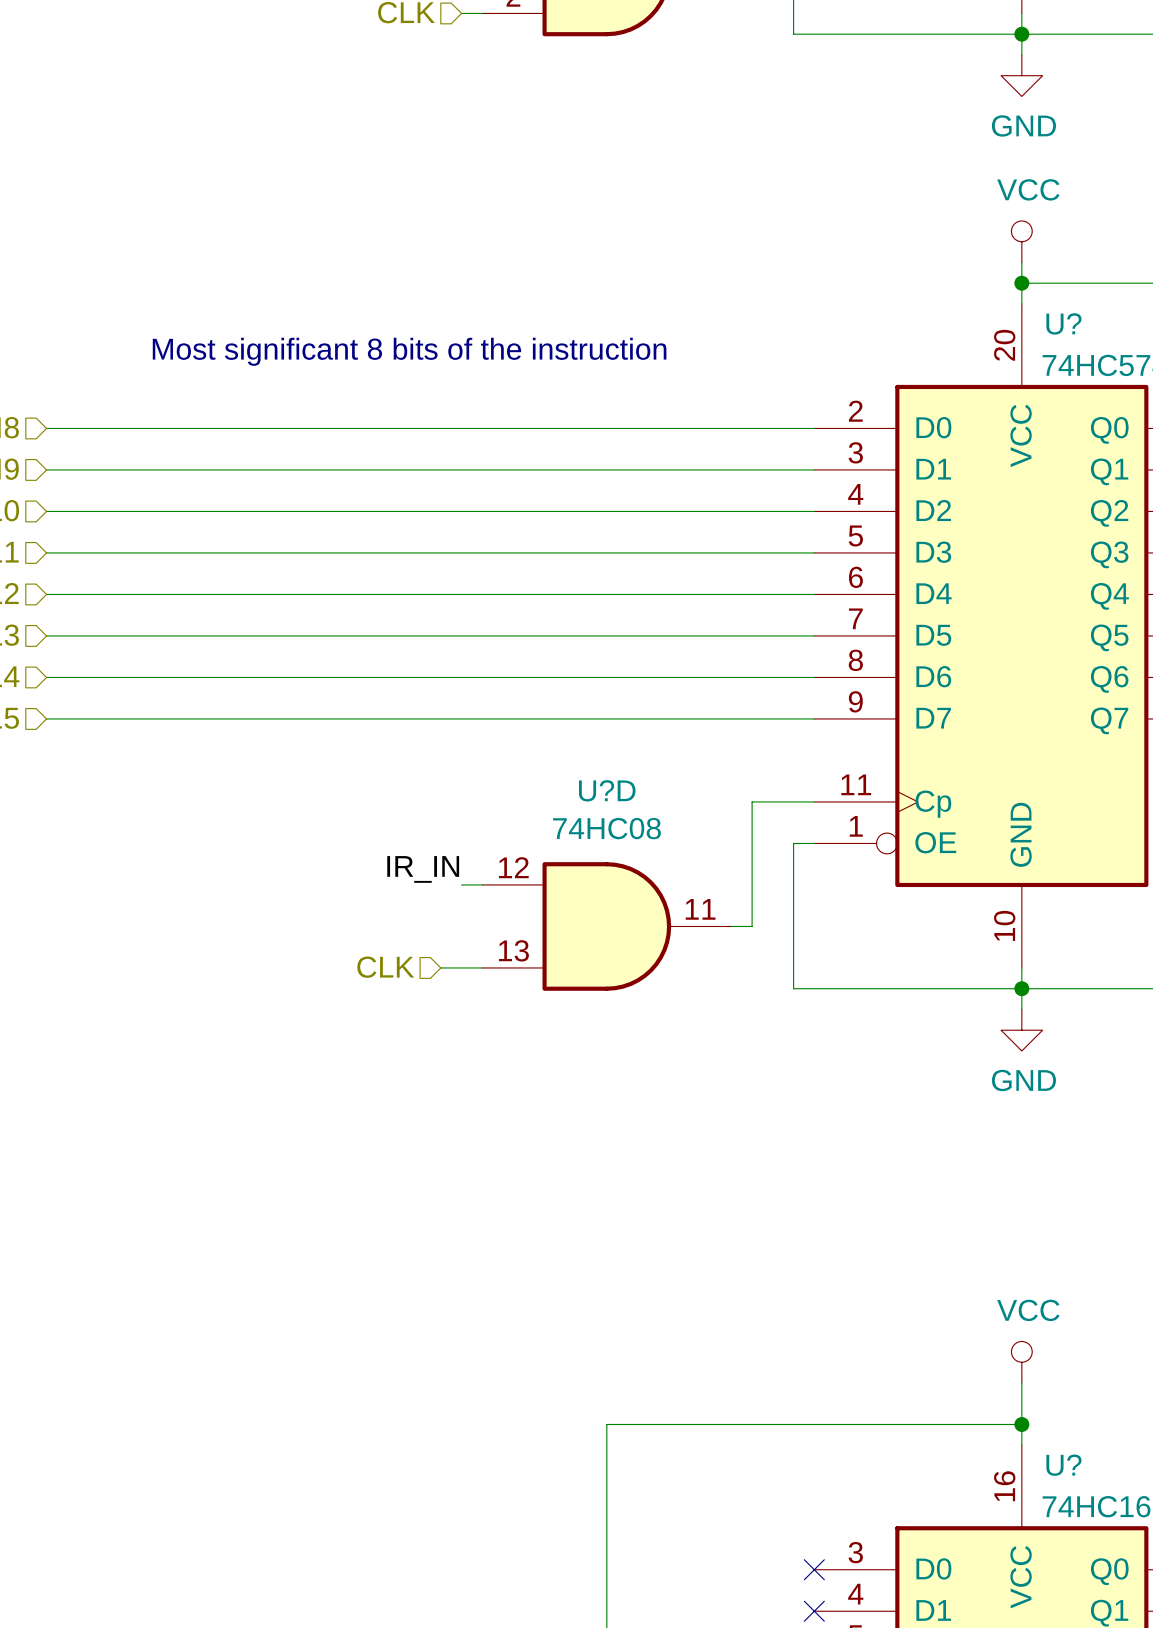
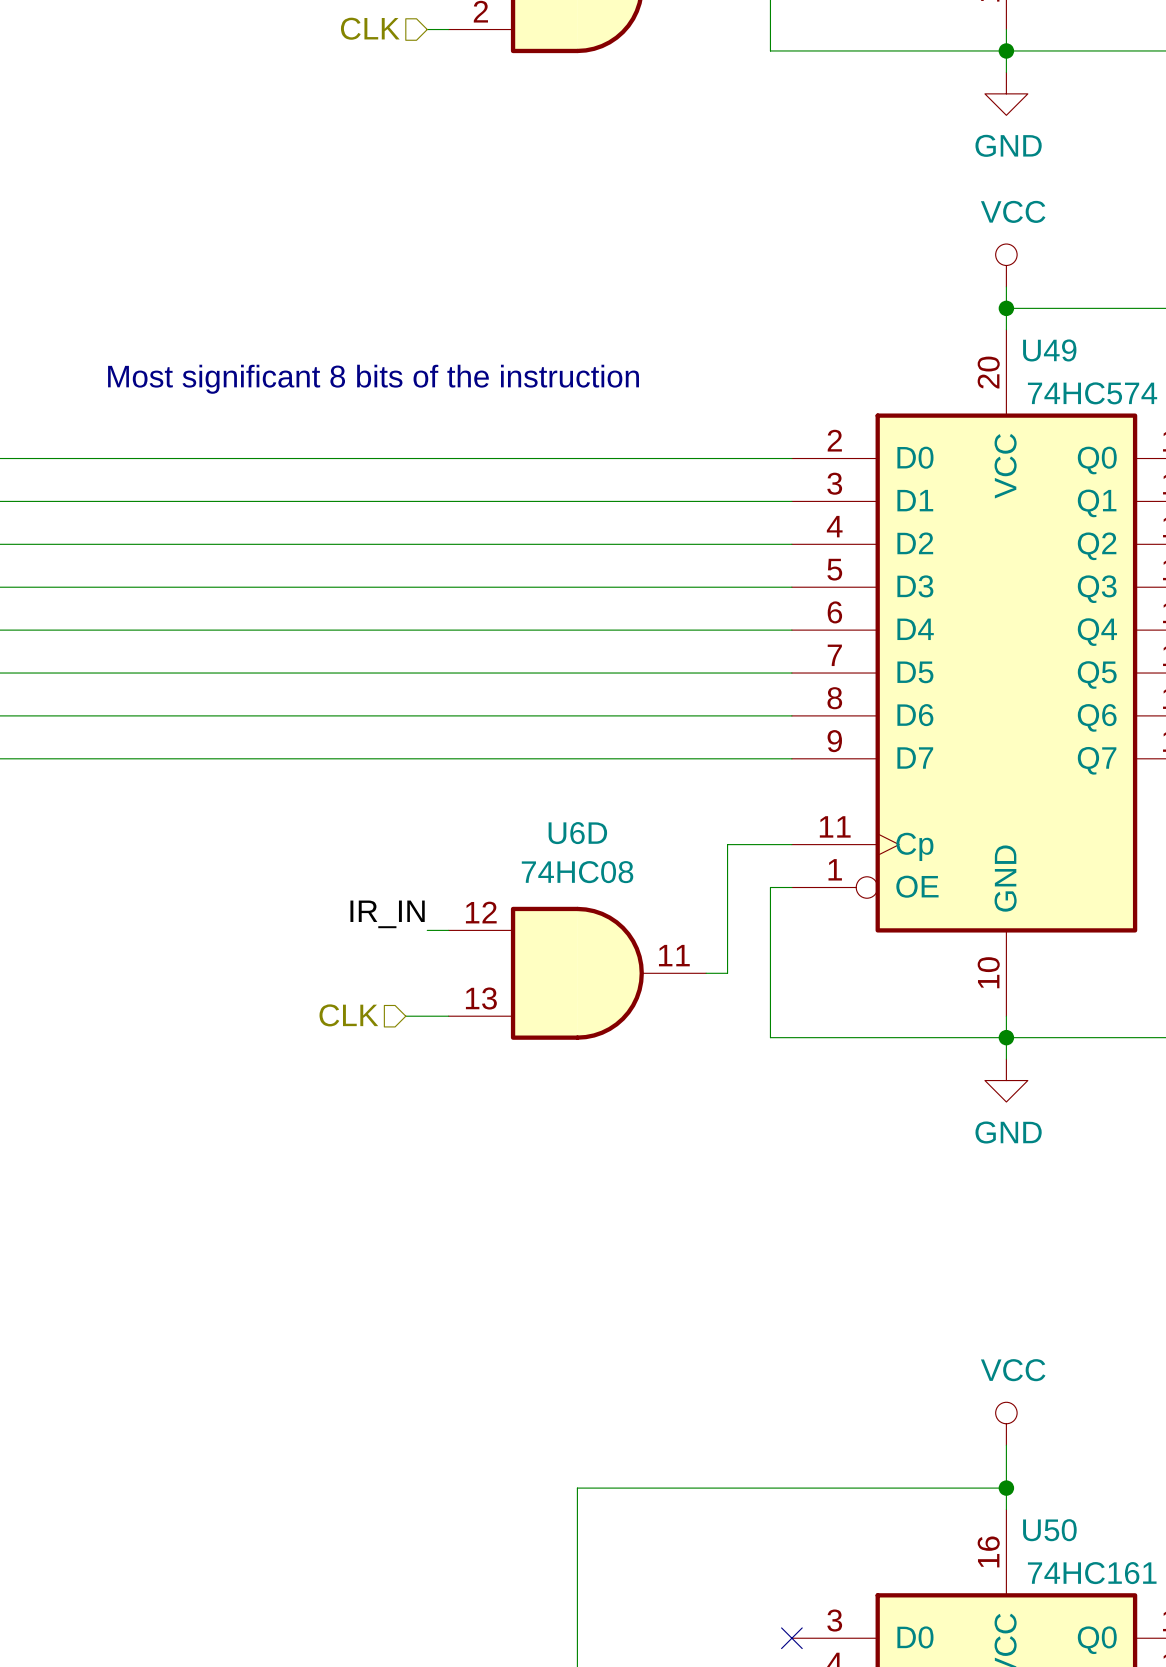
U? name: U? (1063, 323) -> U49 (1049, 350)
U?D name: U?D (607, 790) -> U6D (577, 833)
U? name: U? (1063, 1465) -> U50 (1049, 1530)

